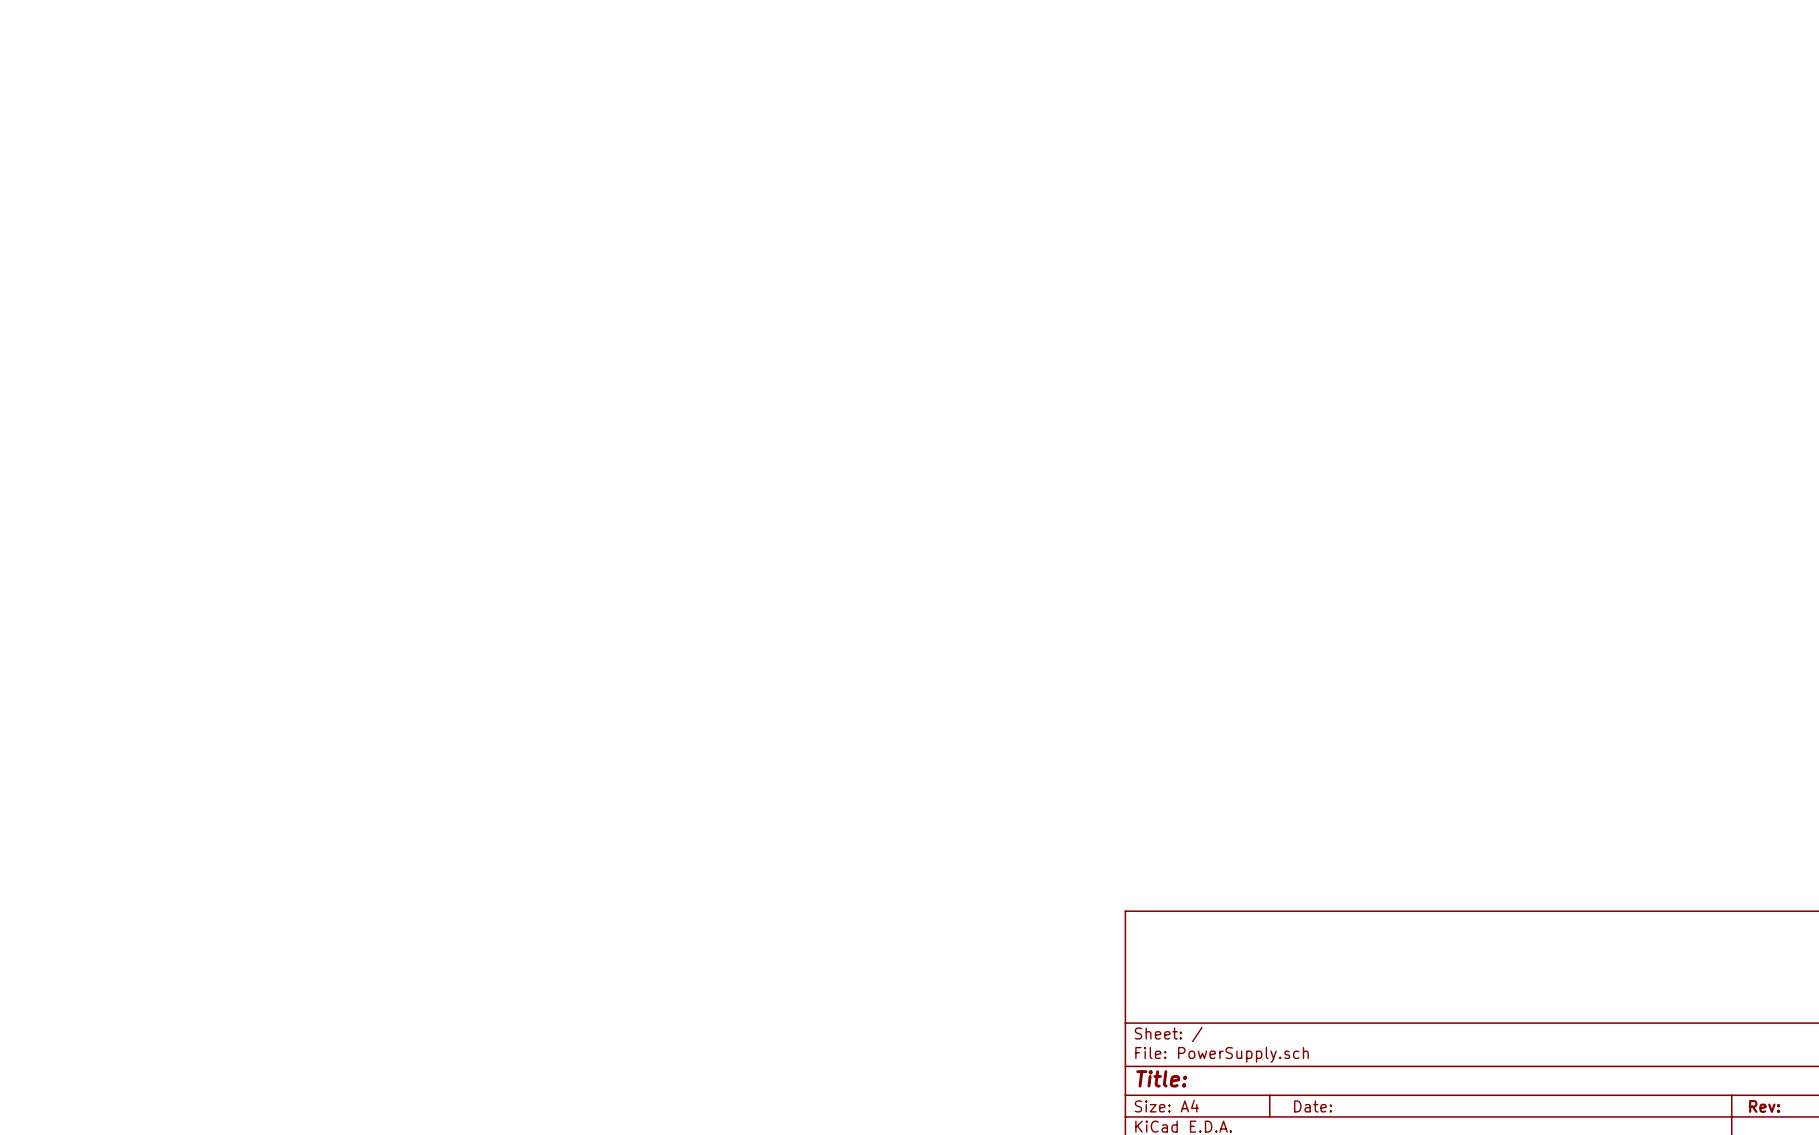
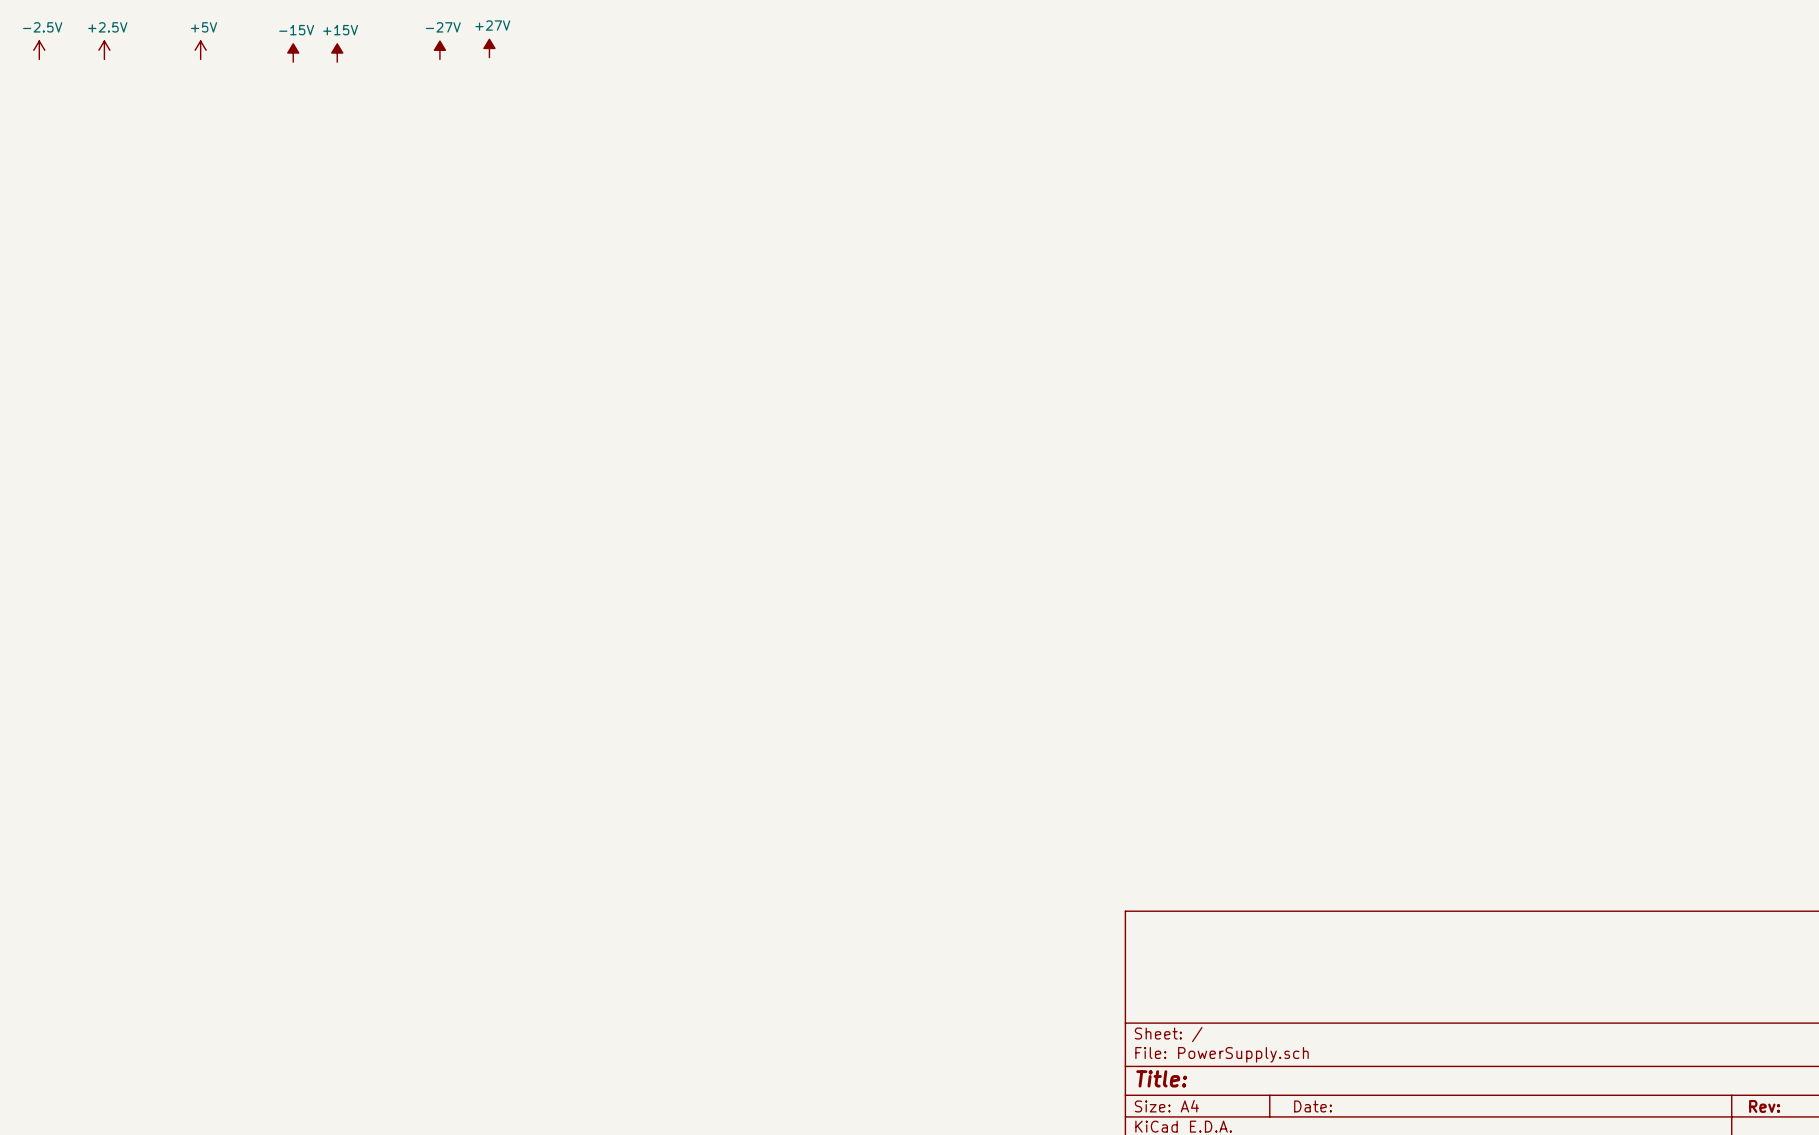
power symbol: none -> +27V (489, 48)
power symbol: none -> -2.5V (39, 50)
power symbol: none -> +2.5V (104, 50)
power symbol: none -> +5V (200, 50)
power symbol: none -> -27V (439, 50)
power symbol: none -> -15V (293, 53)
power symbol: none -> +15V (337, 53)

